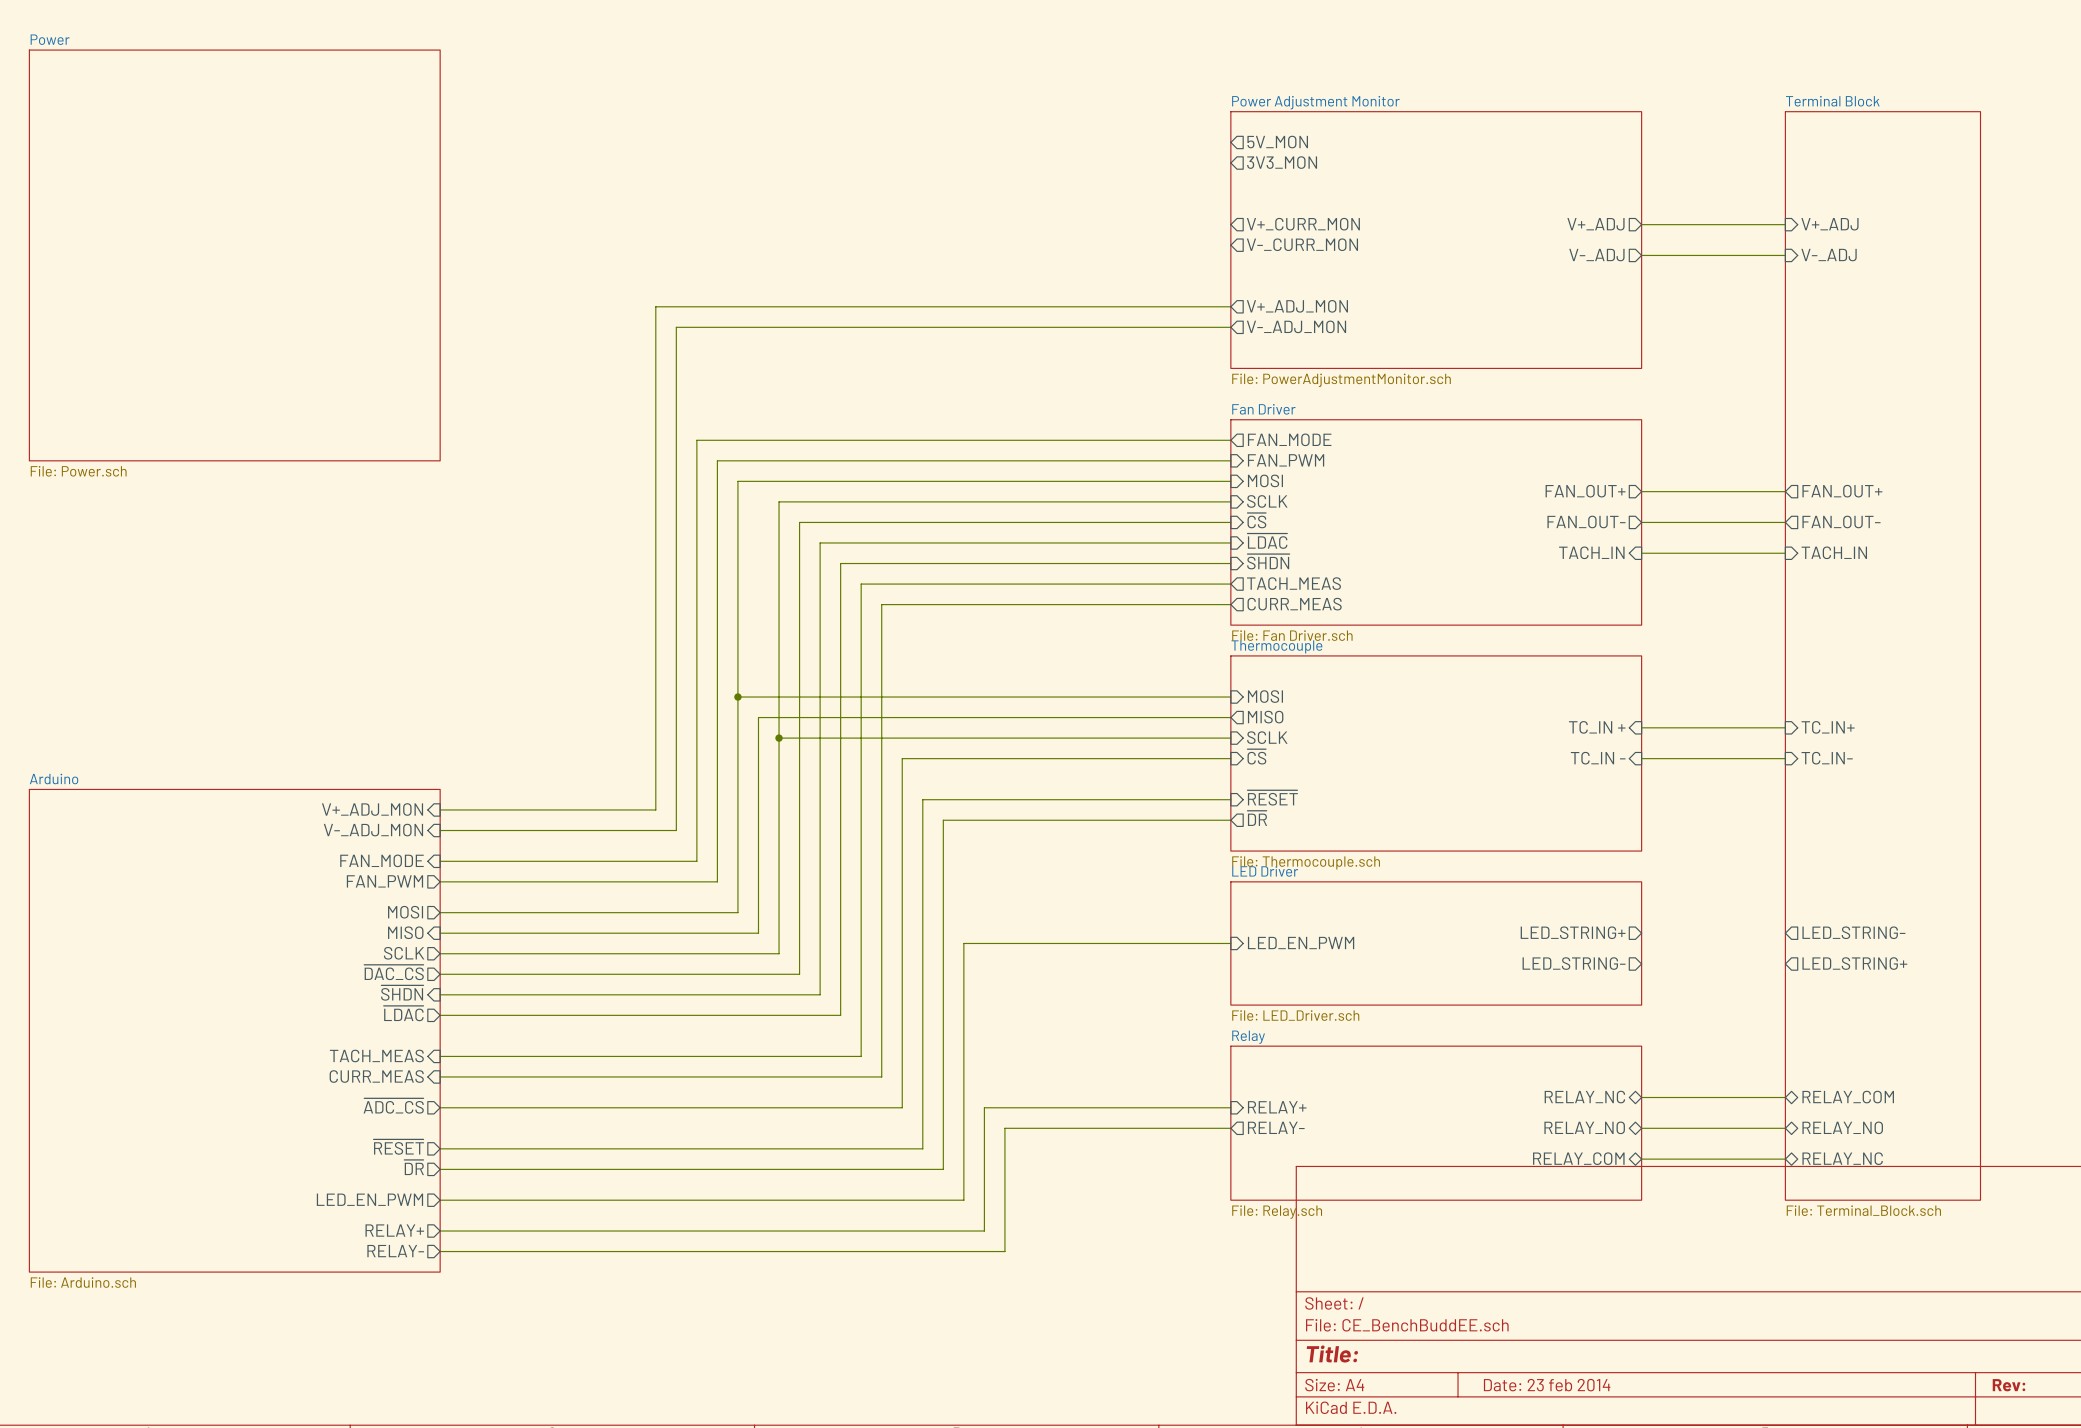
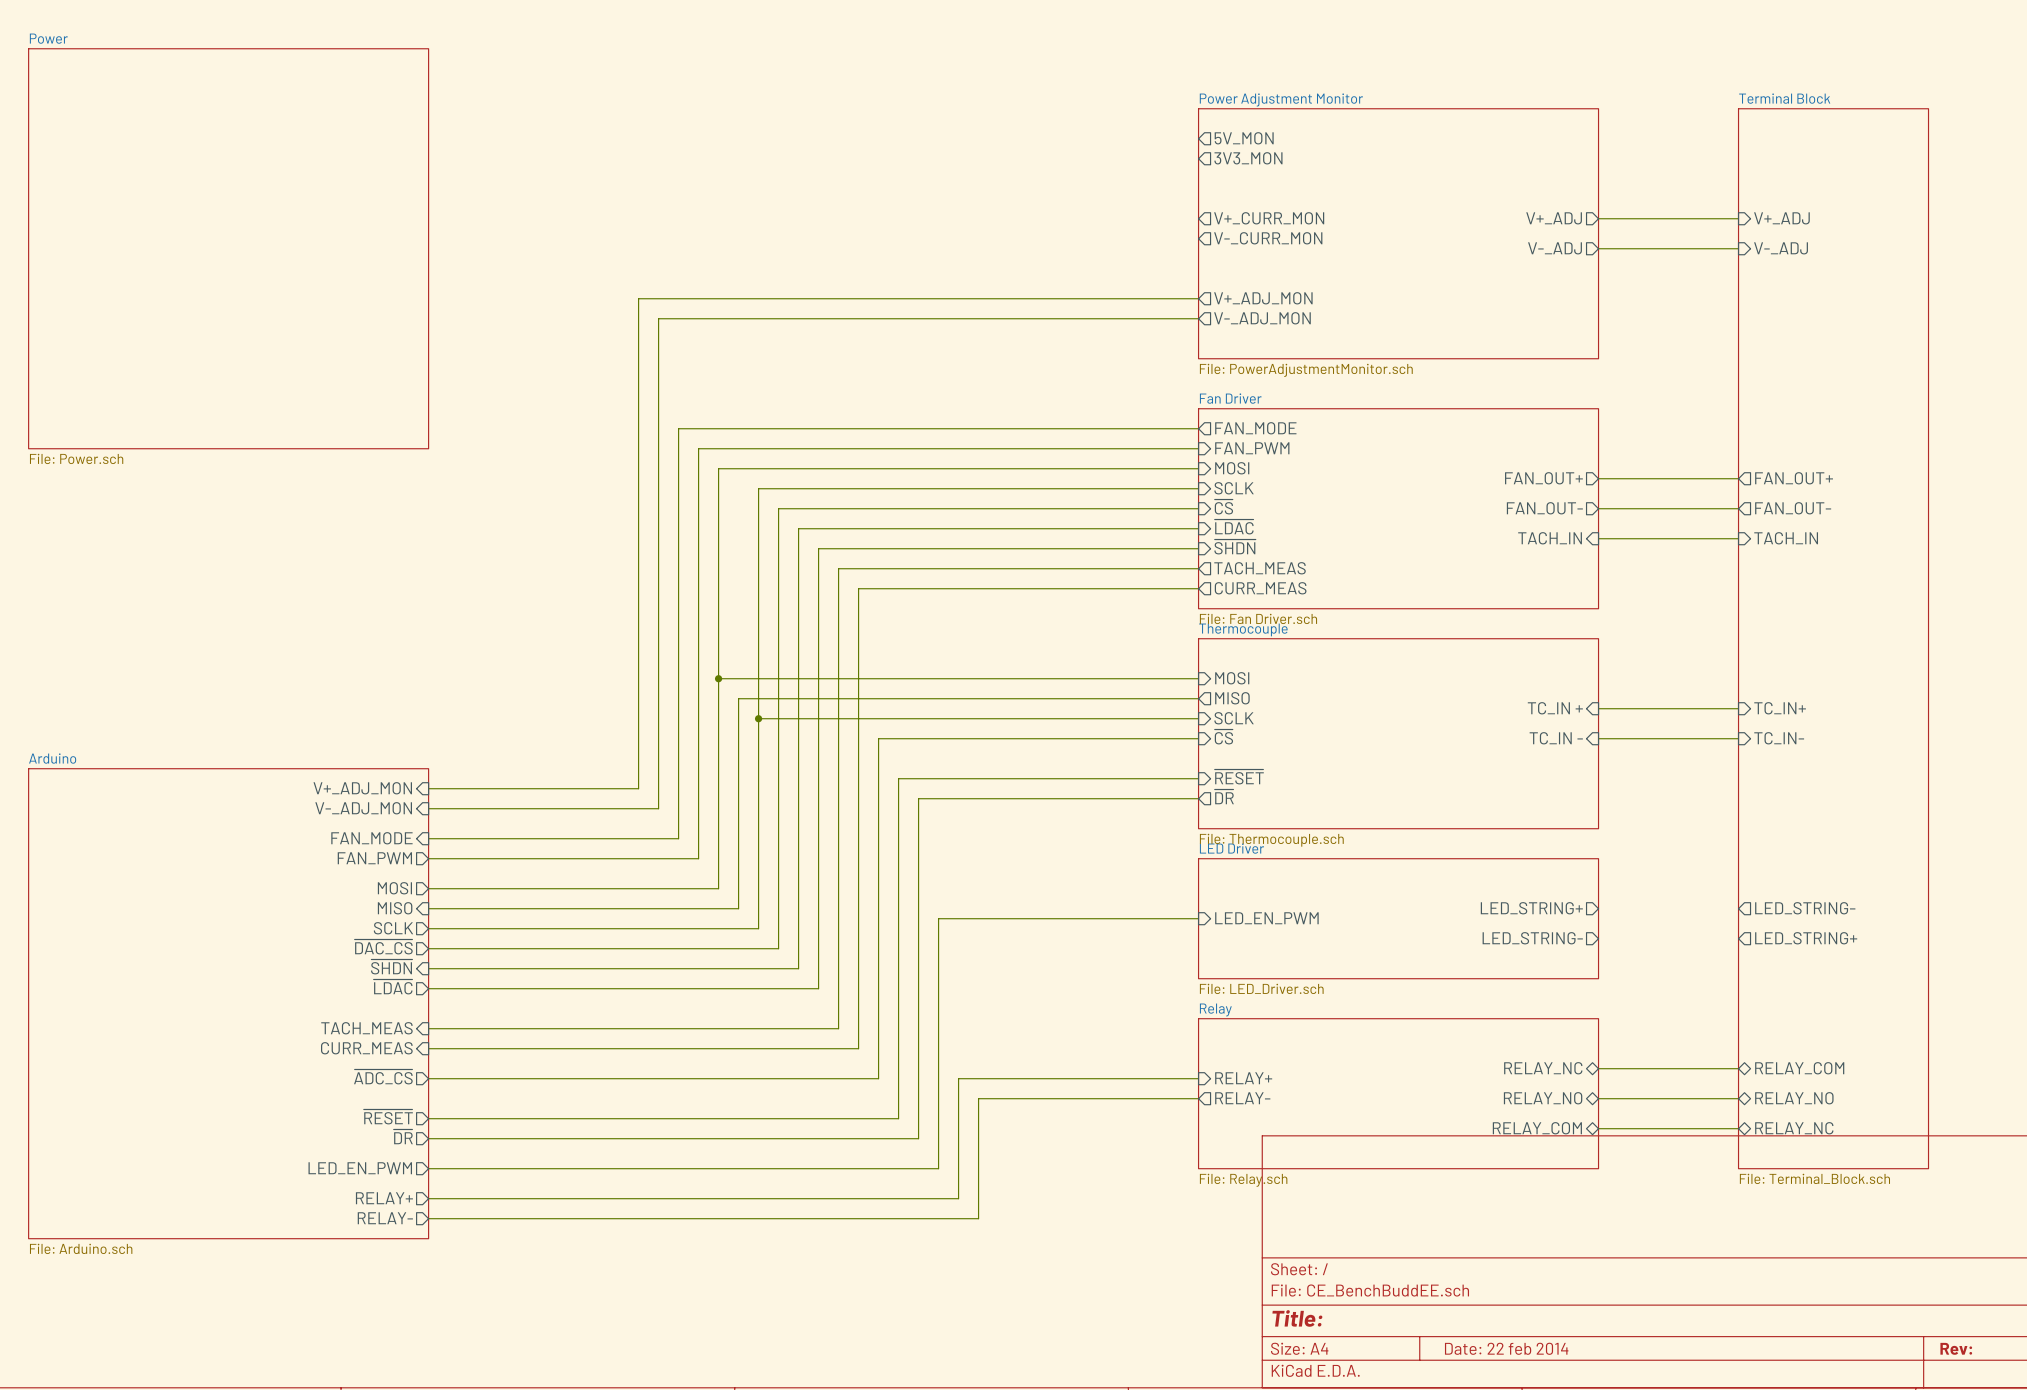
title block: Date: 23 feb 2014 (1547, 1385) -> Date: 22 feb 2014 (1506, 1348)

